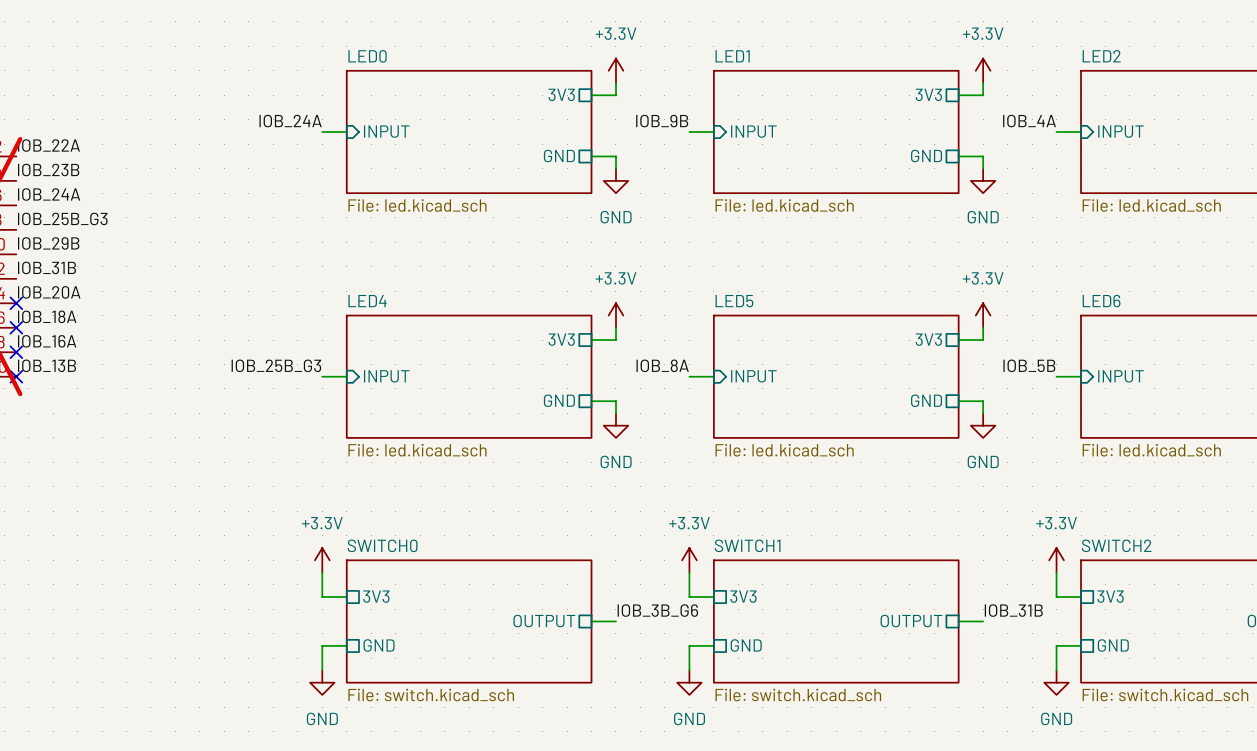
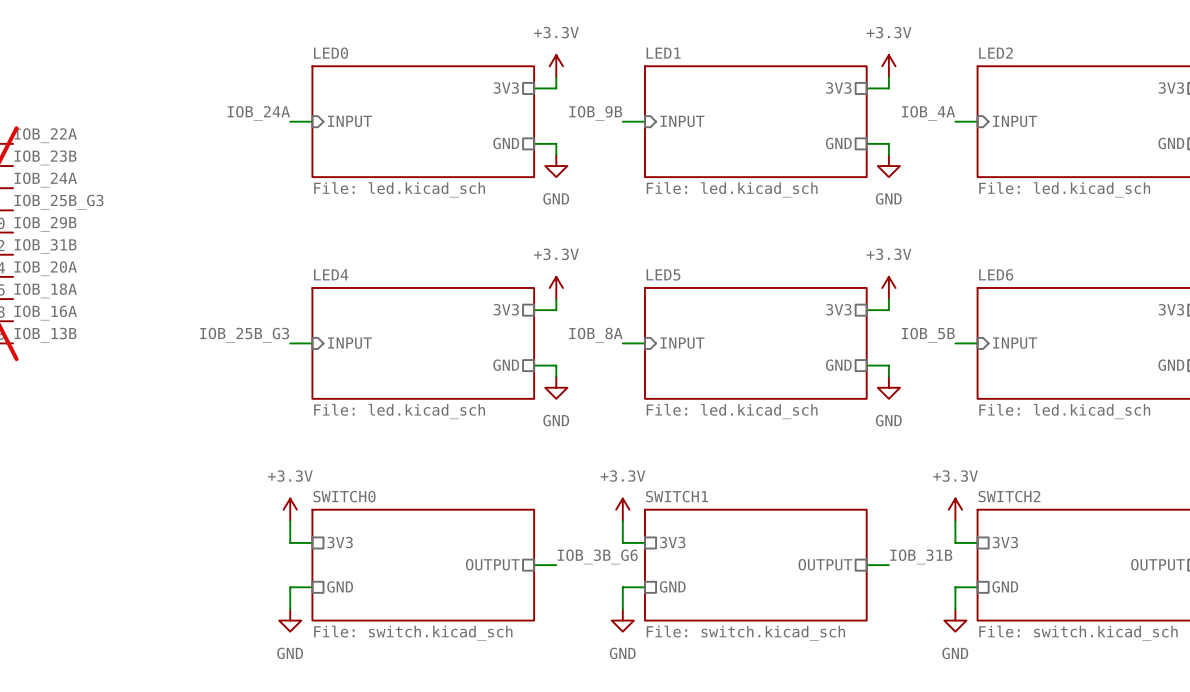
no-connect mark: (16, 303) -> none
no-connect mark: (16, 327) -> none
no-connect mark: (16, 352) -> none
no-connect mark: (16, 376) -> none

